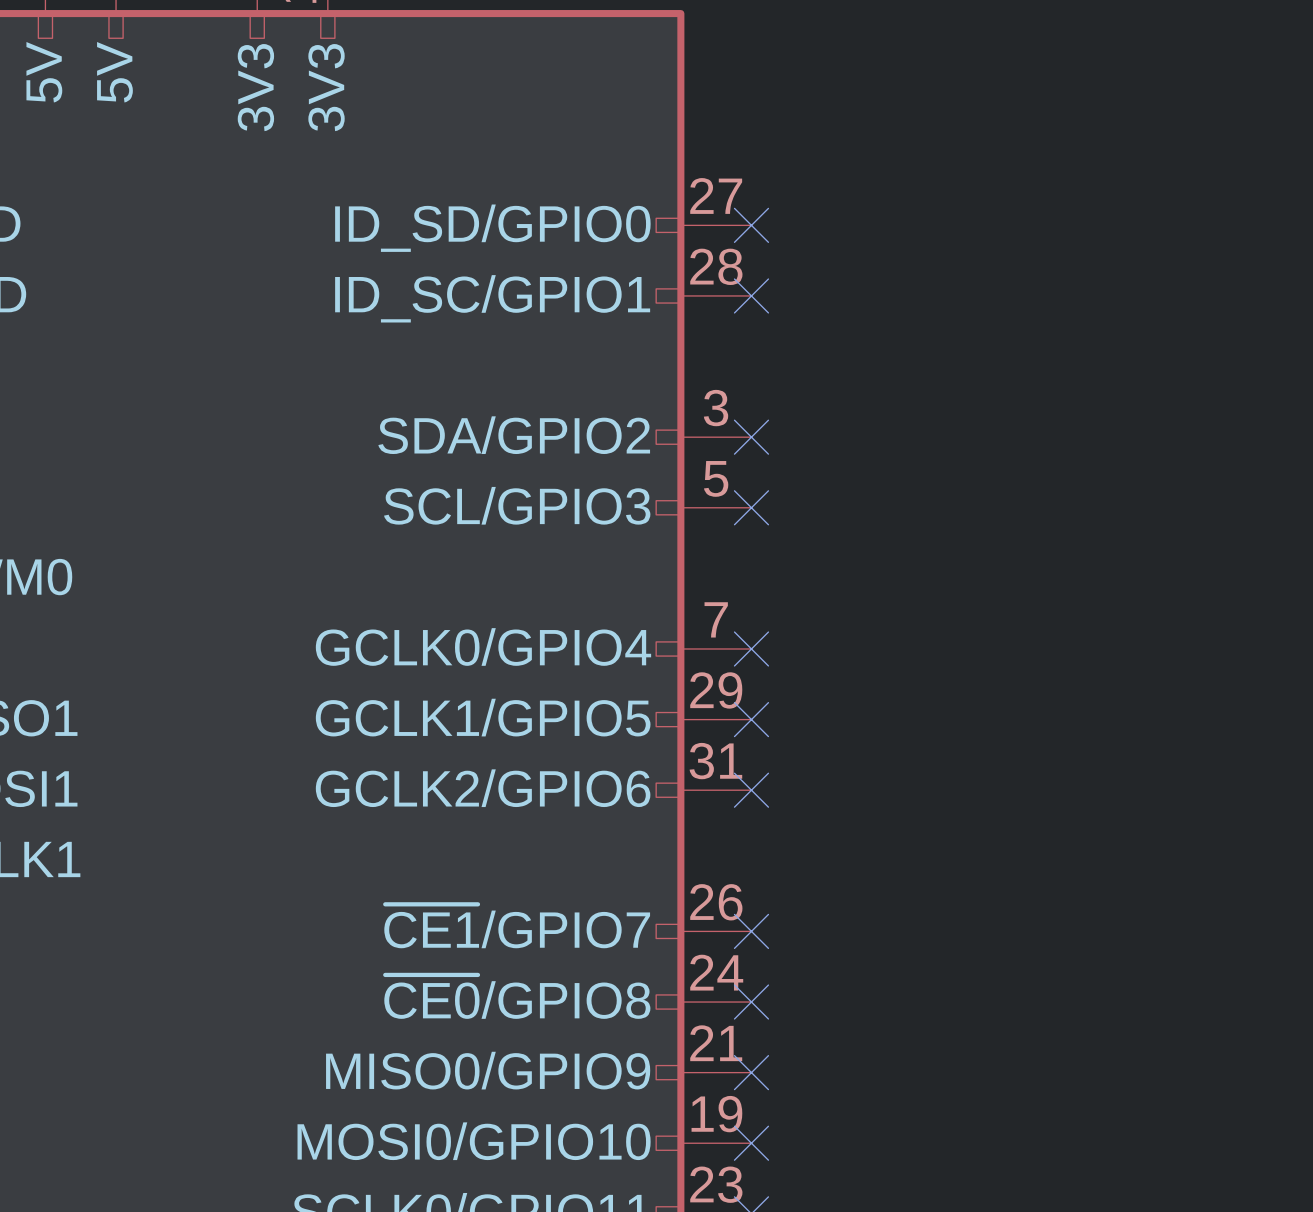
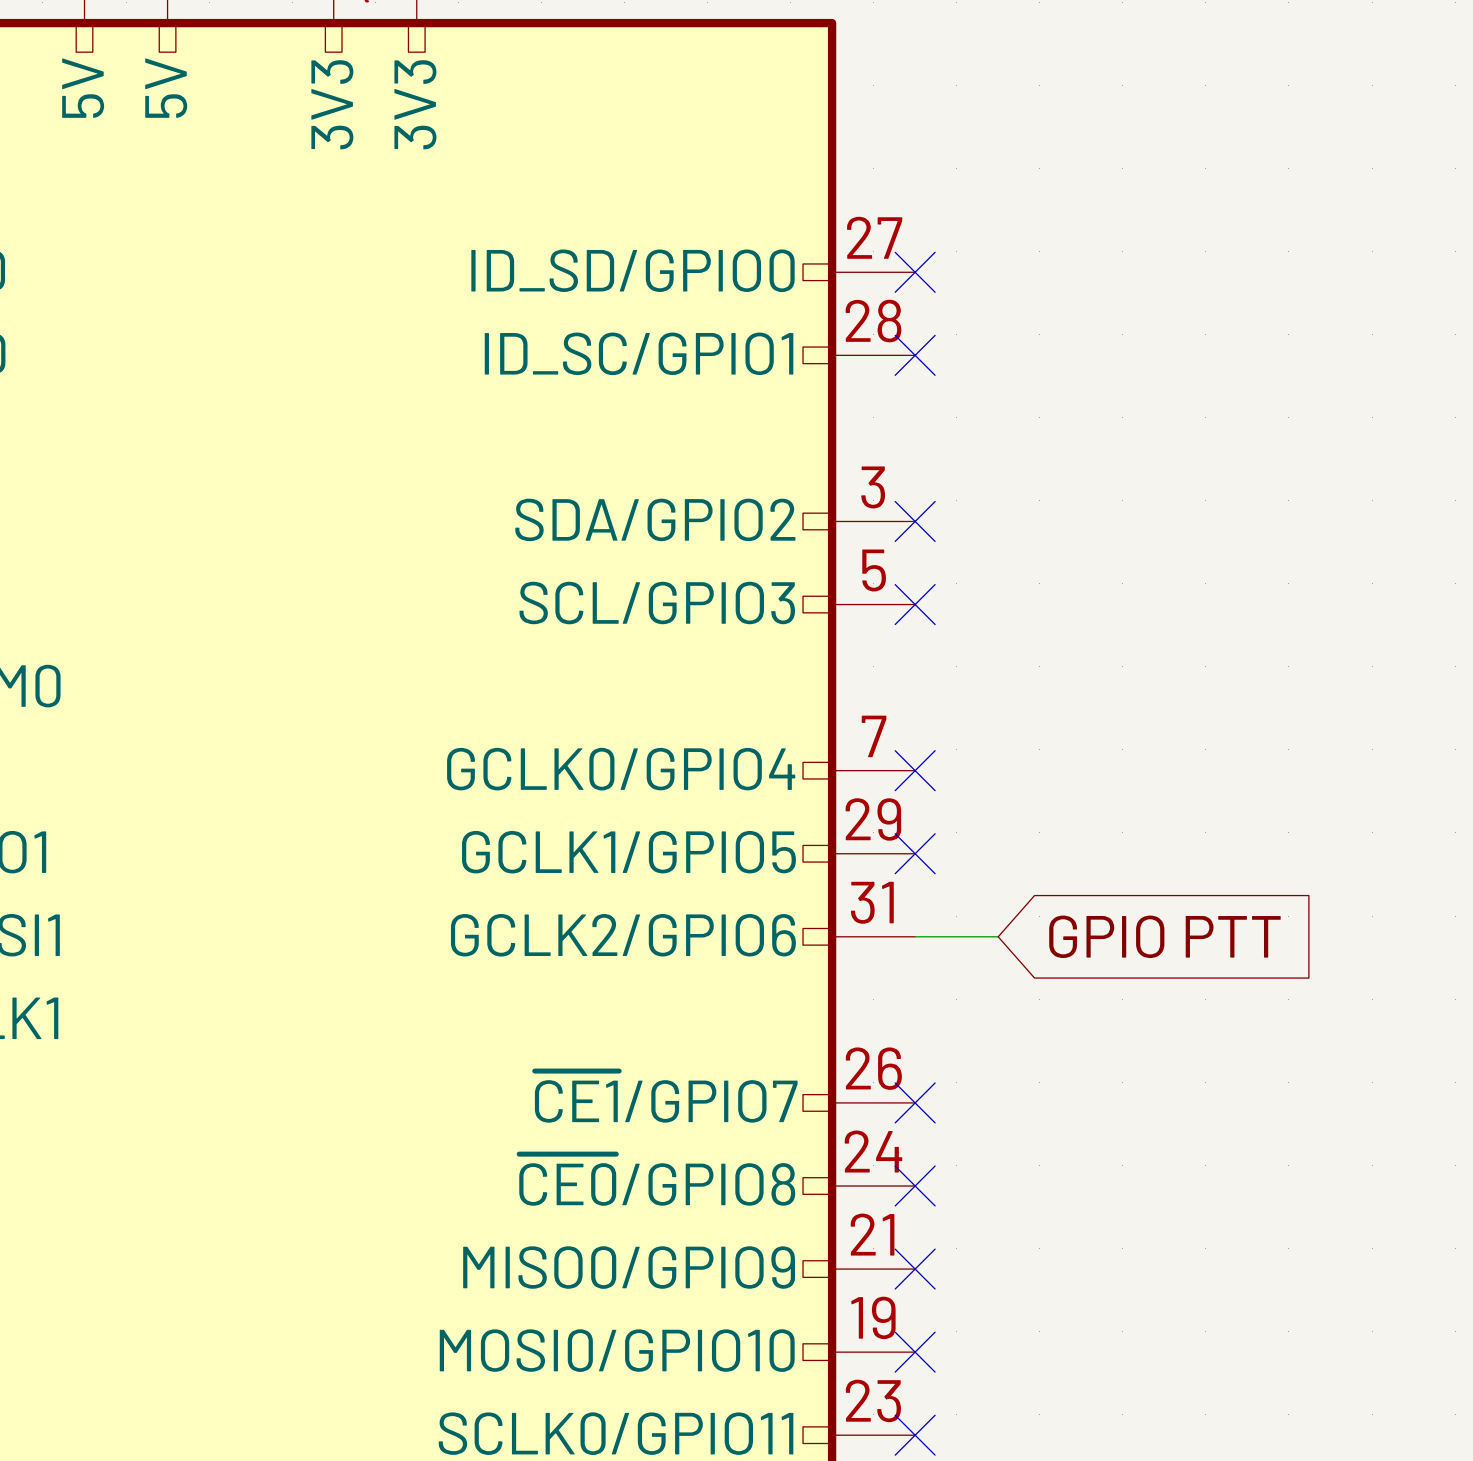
wire: none -> (915, 936) (998, 936)
no-connect mark: (751, 790) -> none
global label: none -> GPIO PTT (1164, 936)

